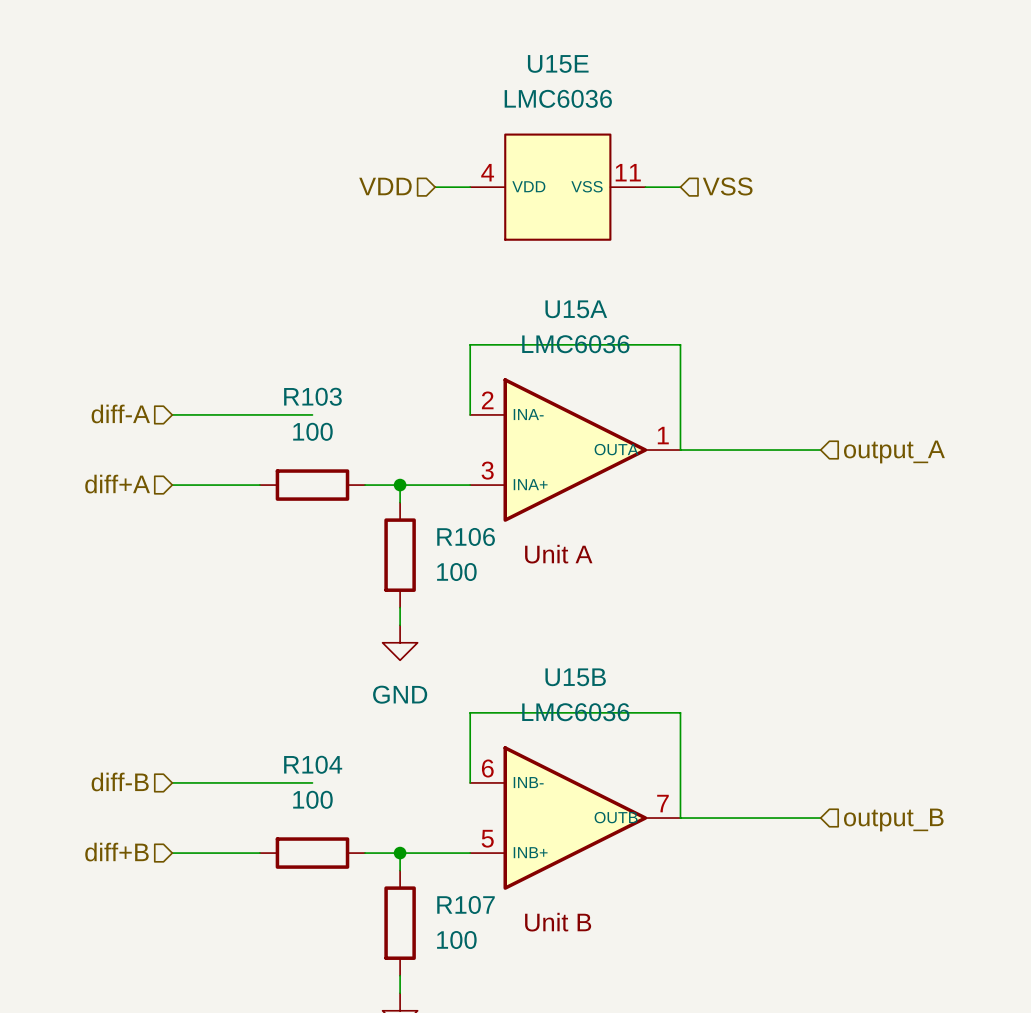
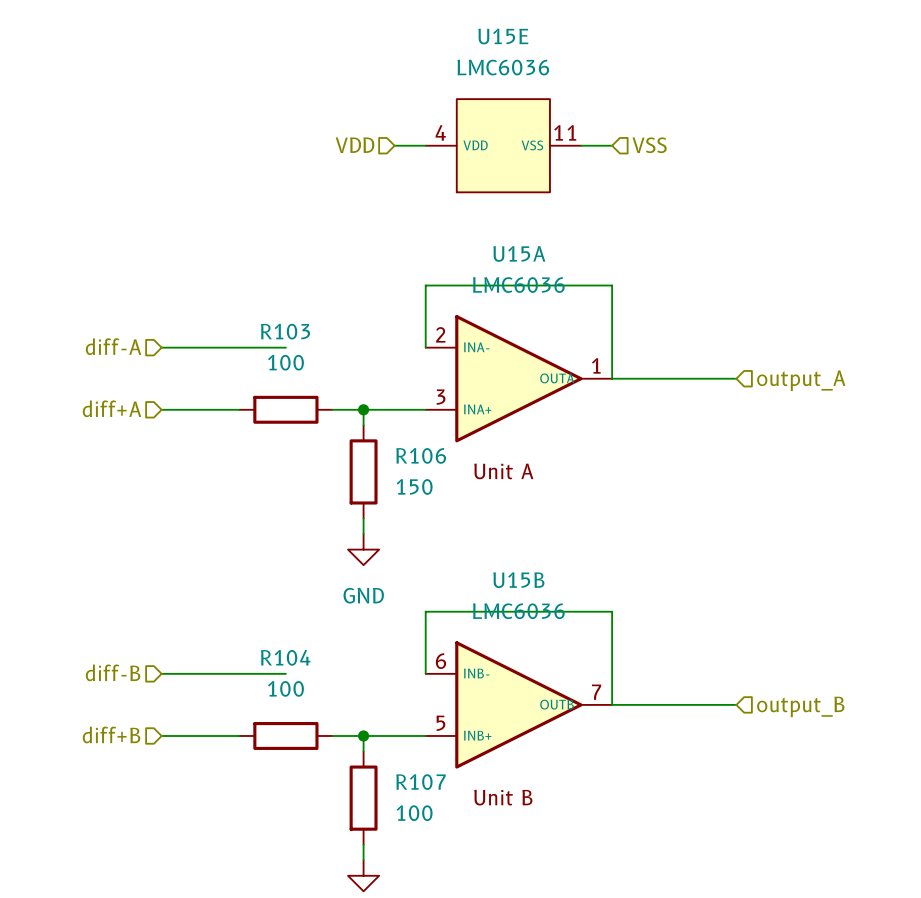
R106 value: 100 (456, 572) -> 150 (414, 486)

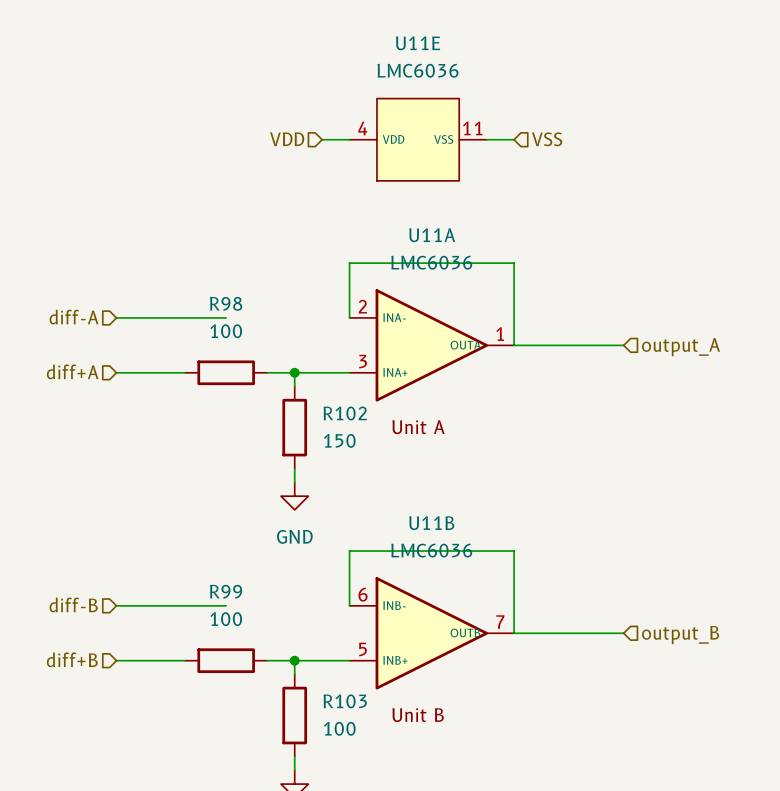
U15E name: U15E (503, 36) -> U11E (418, 43)
U15A name: U15A (519, 253) -> U11A (432, 235)
R103 name: R103 (285, 331) -> R98 (226, 303)
R106 name: R106 (421, 455) -> R102 (345, 413)
U15B name: U15B (518, 580) -> U11B (431, 523)
R104 name: R104 (285, 657) -> R99 (226, 591)
R107 name: R107 (420, 782) -> R103 (345, 701)

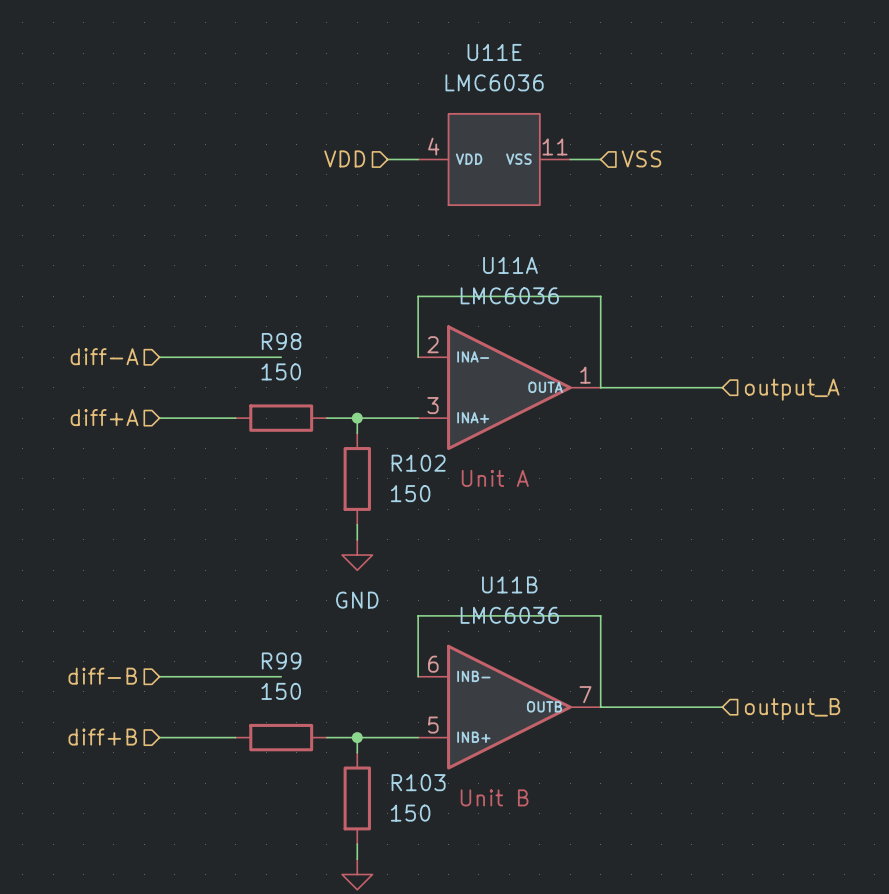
R98 value: 100 (226, 331) -> 150 (281, 371)
R99 value: 100 (226, 619) -> 150 (281, 691)
R103 value: 100 (339, 728) -> 150 (410, 813)

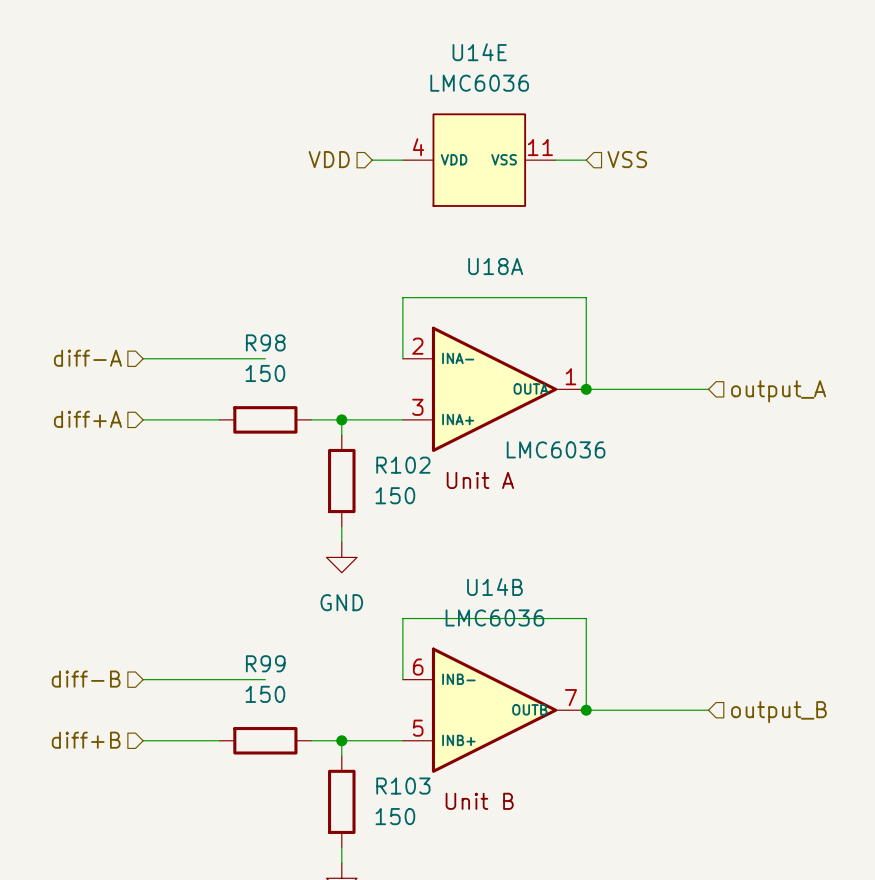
U11E name: U11E (494, 52) -> U14E (479, 52)
U11A name: U11A (510, 265) -> U18A (495, 266)
U11A value position: LMC6036 (509, 295) -> LMC6036 (556, 449)
junction: none -> (586, 389)
U11B name: U11B (509, 584) -> U14B (494, 587)
junction: none -> (586, 710)

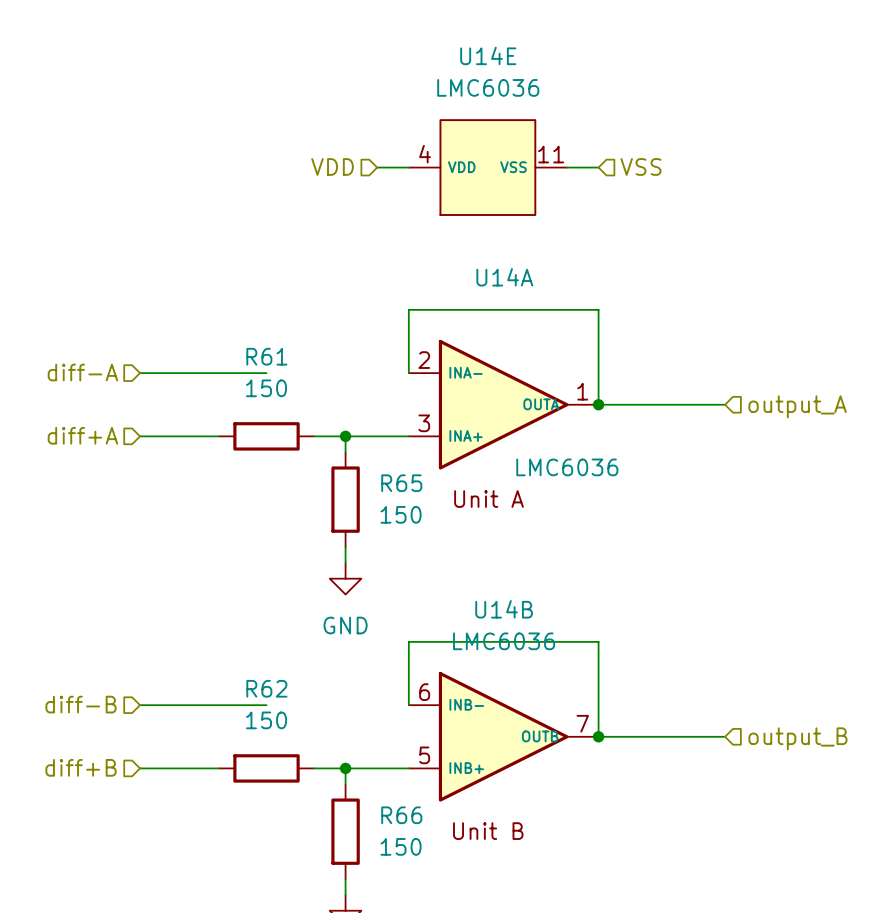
U18A name: U18A (495, 266) -> U14A (504, 277)
R98 name: R98 (265, 342) -> R61 (266, 356)
R102 name: R102 (403, 465) -> R65 (401, 483)
R99 name: R99 (265, 663) -> R62 (266, 688)
R103 name: R103 (403, 786) -> R66 (401, 815)

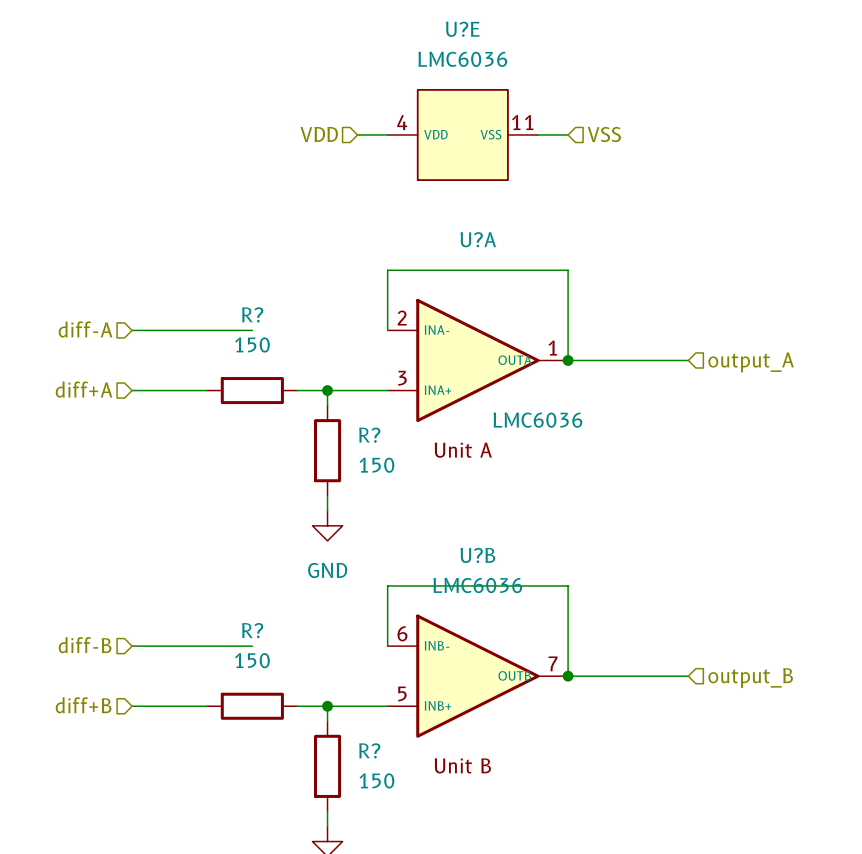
U14E name: U14E (488, 55) -> U?E (462, 29)
U14A name: U14A (504, 277) -> U?A (478, 239)
R61 name: R61 (266, 356) -> R? (252, 314)
R65 name: R65 (401, 483) -> R? (369, 435)
U14B name: U14B (504, 609) -> U?B (477, 555)
R62 name: R62 (266, 688) -> R? (252, 630)
R66 name: R66 (401, 815) -> R? (369, 750)

